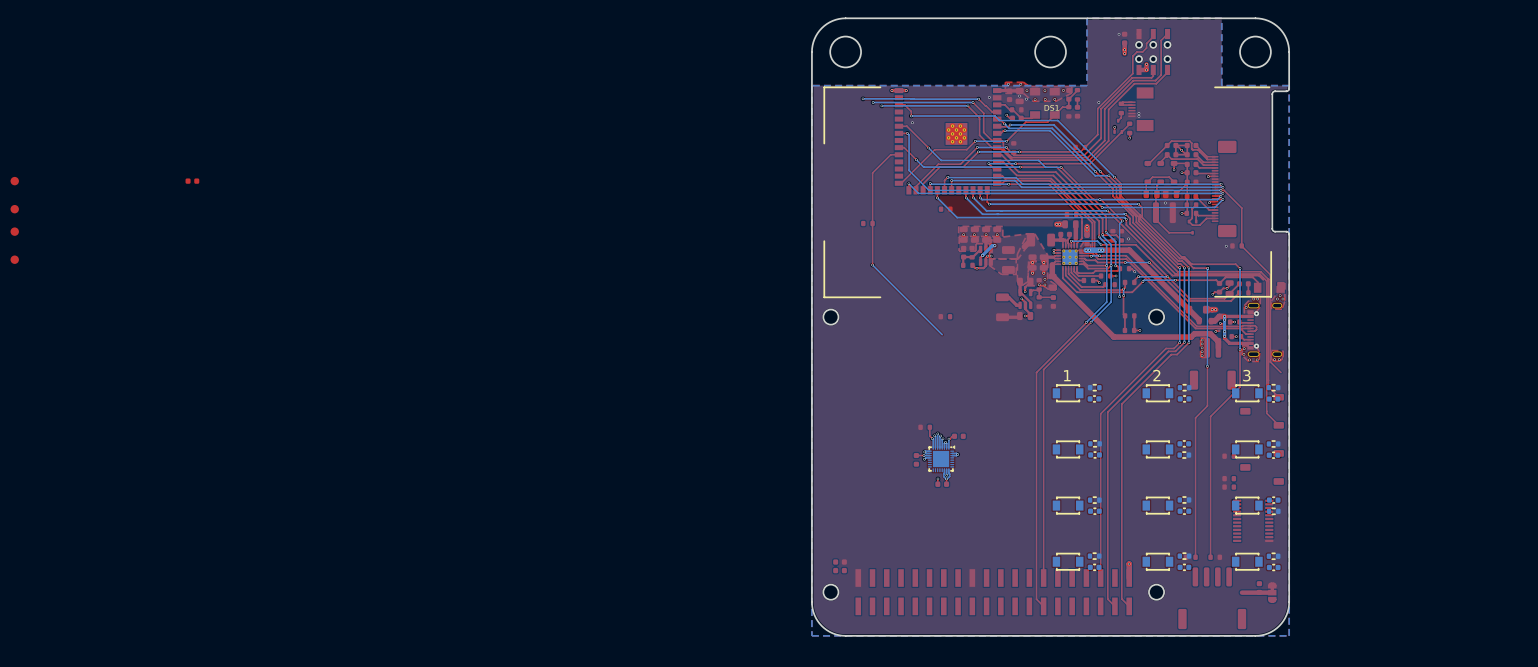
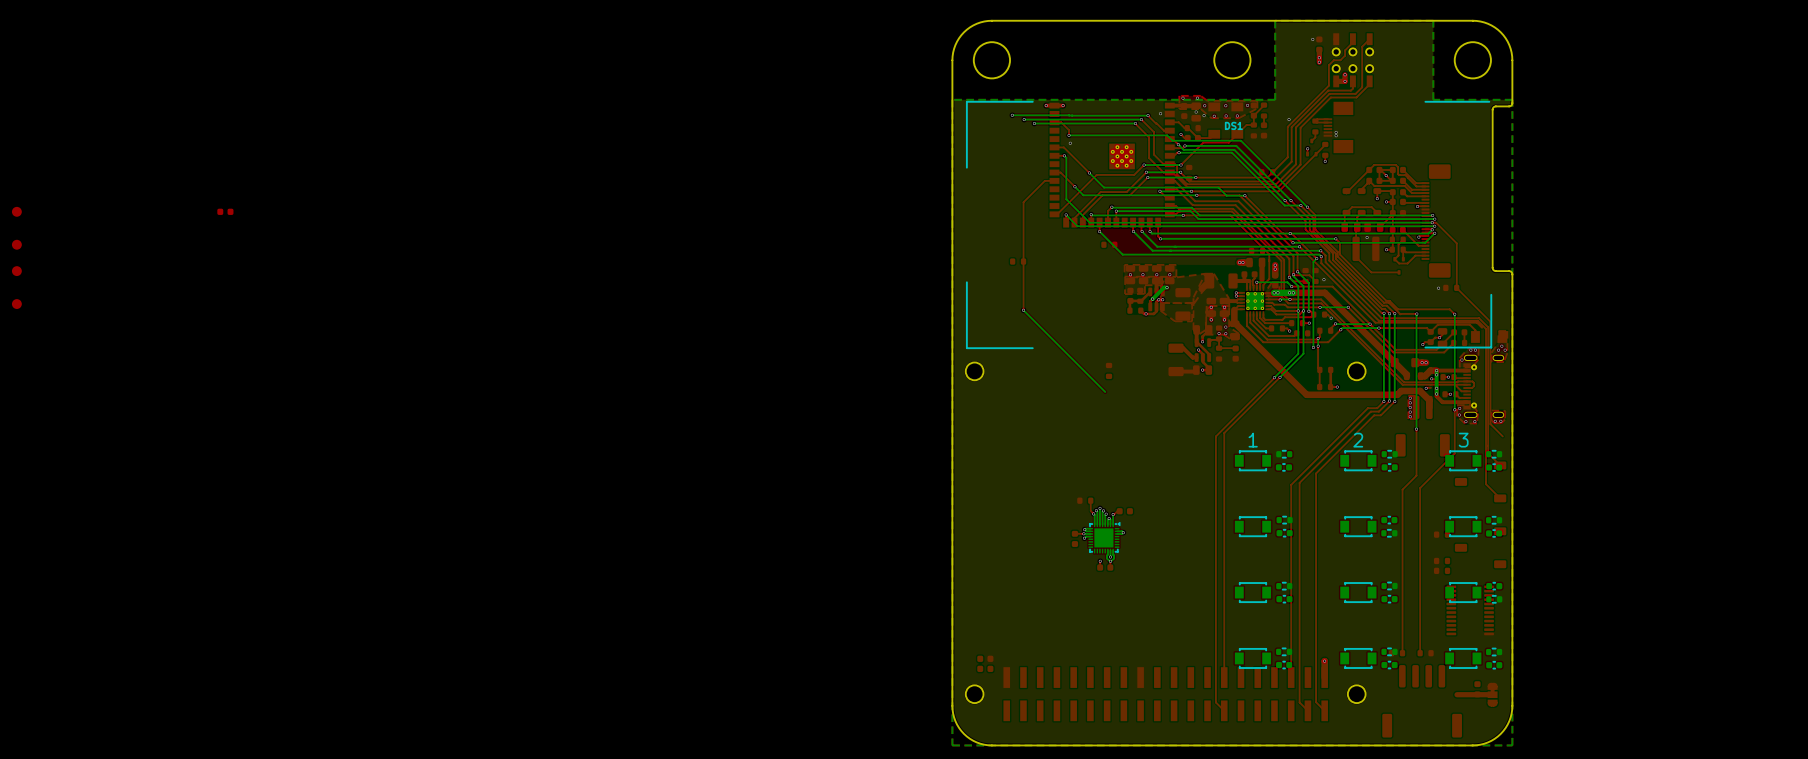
part rotation: 0° (945, 316) -> 90° clockwise (1109, 370)

